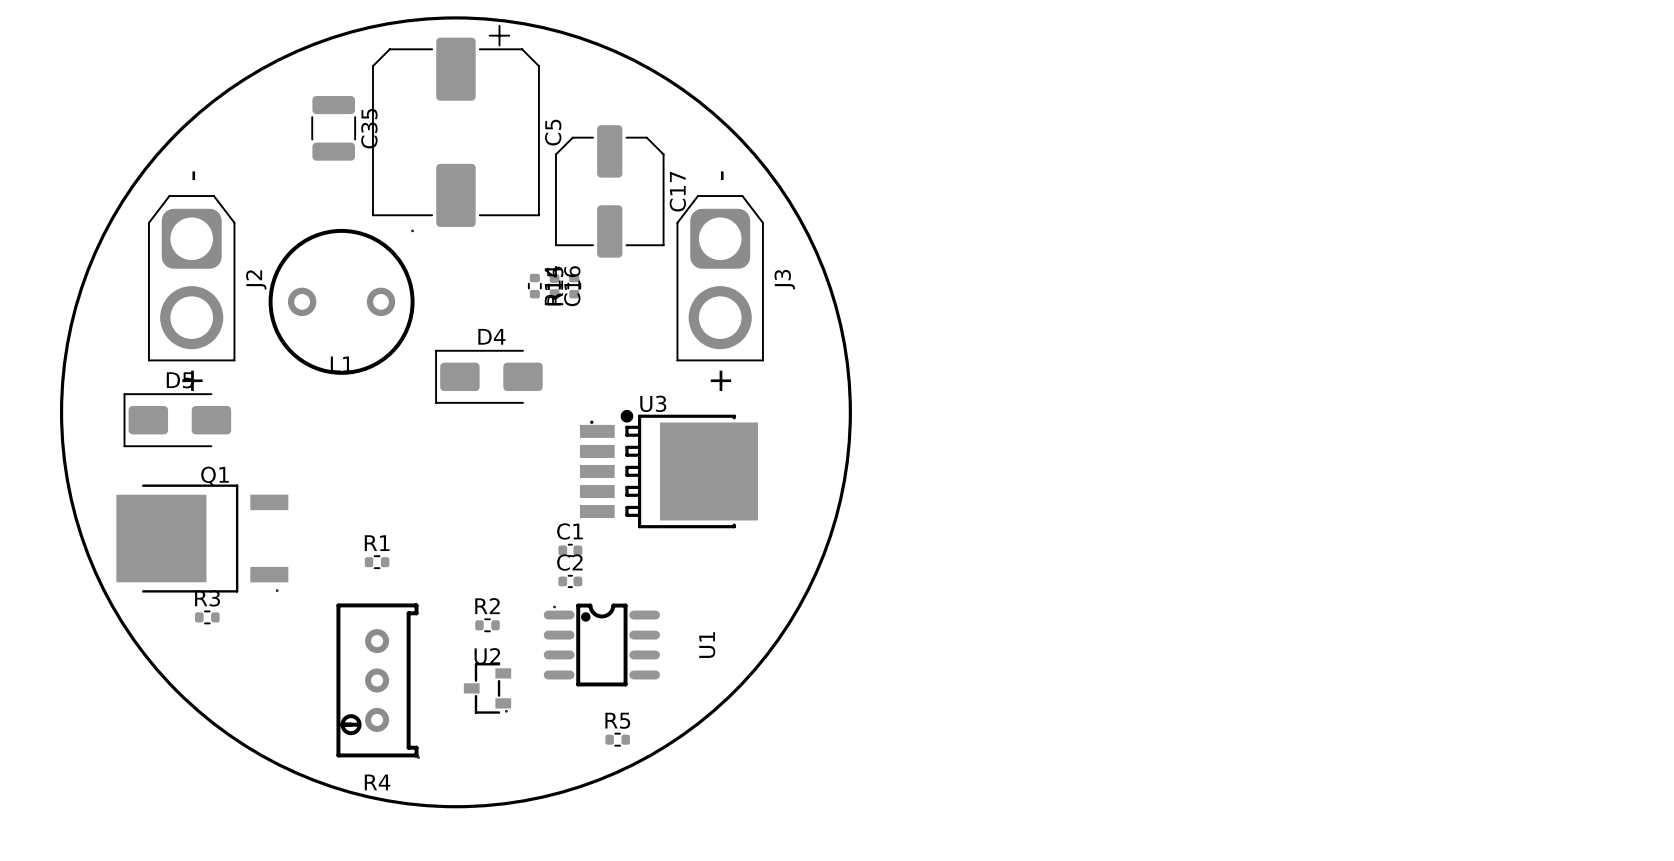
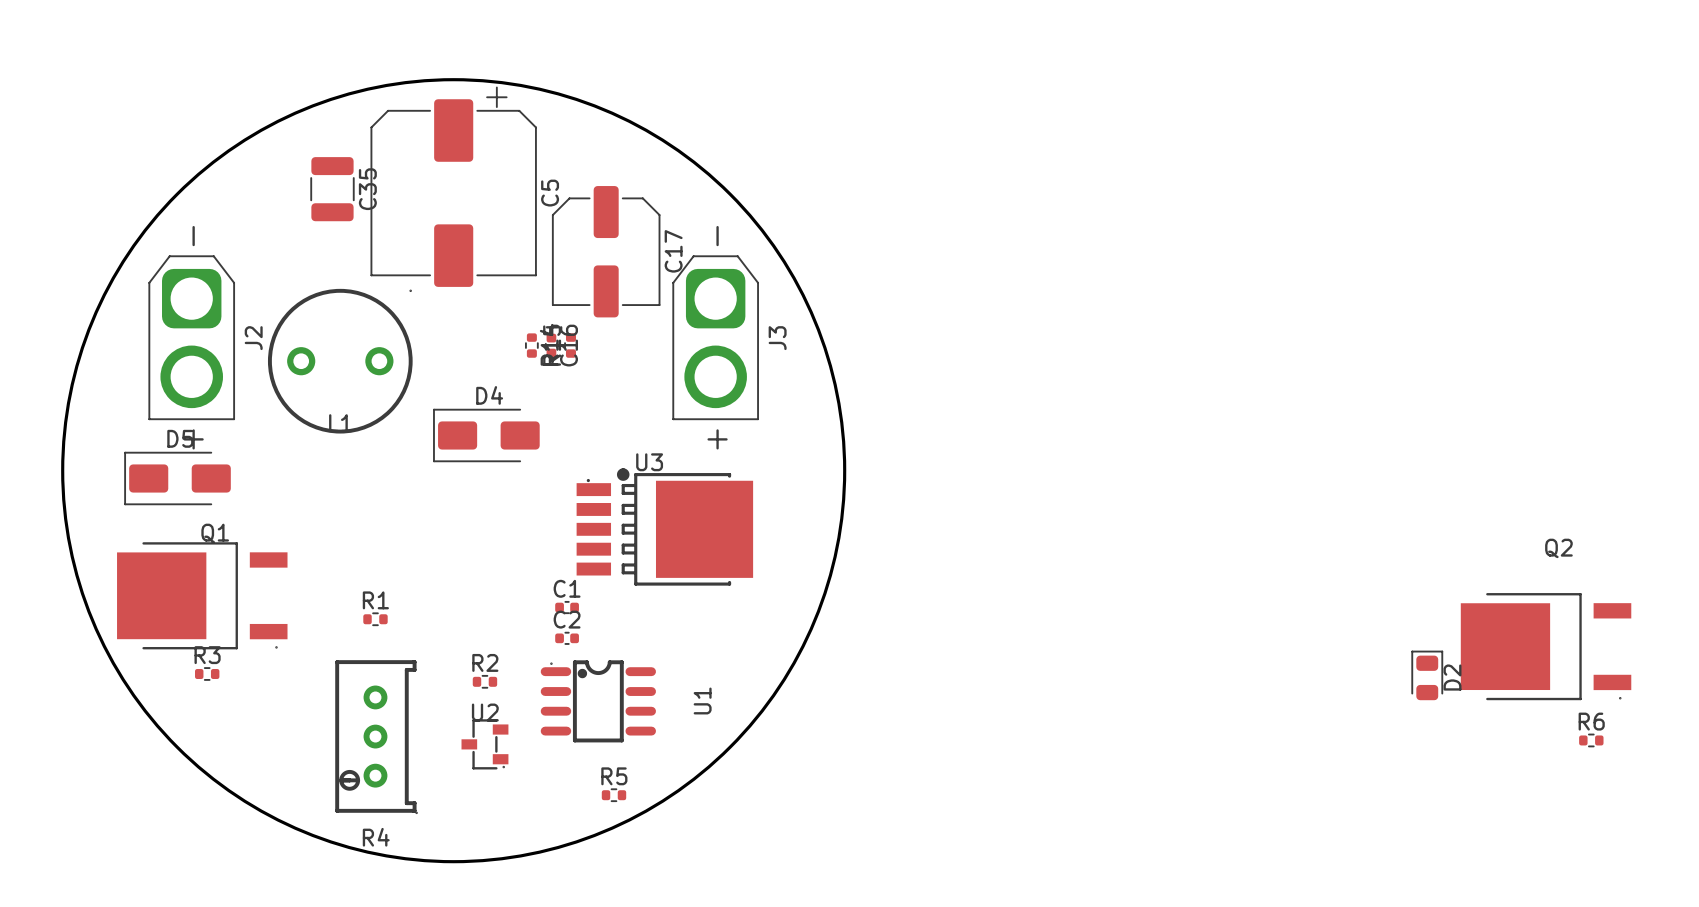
Q2: none -> (1546, 646)
D2: none -> (1427, 675)
R6: none -> (1591, 740)

